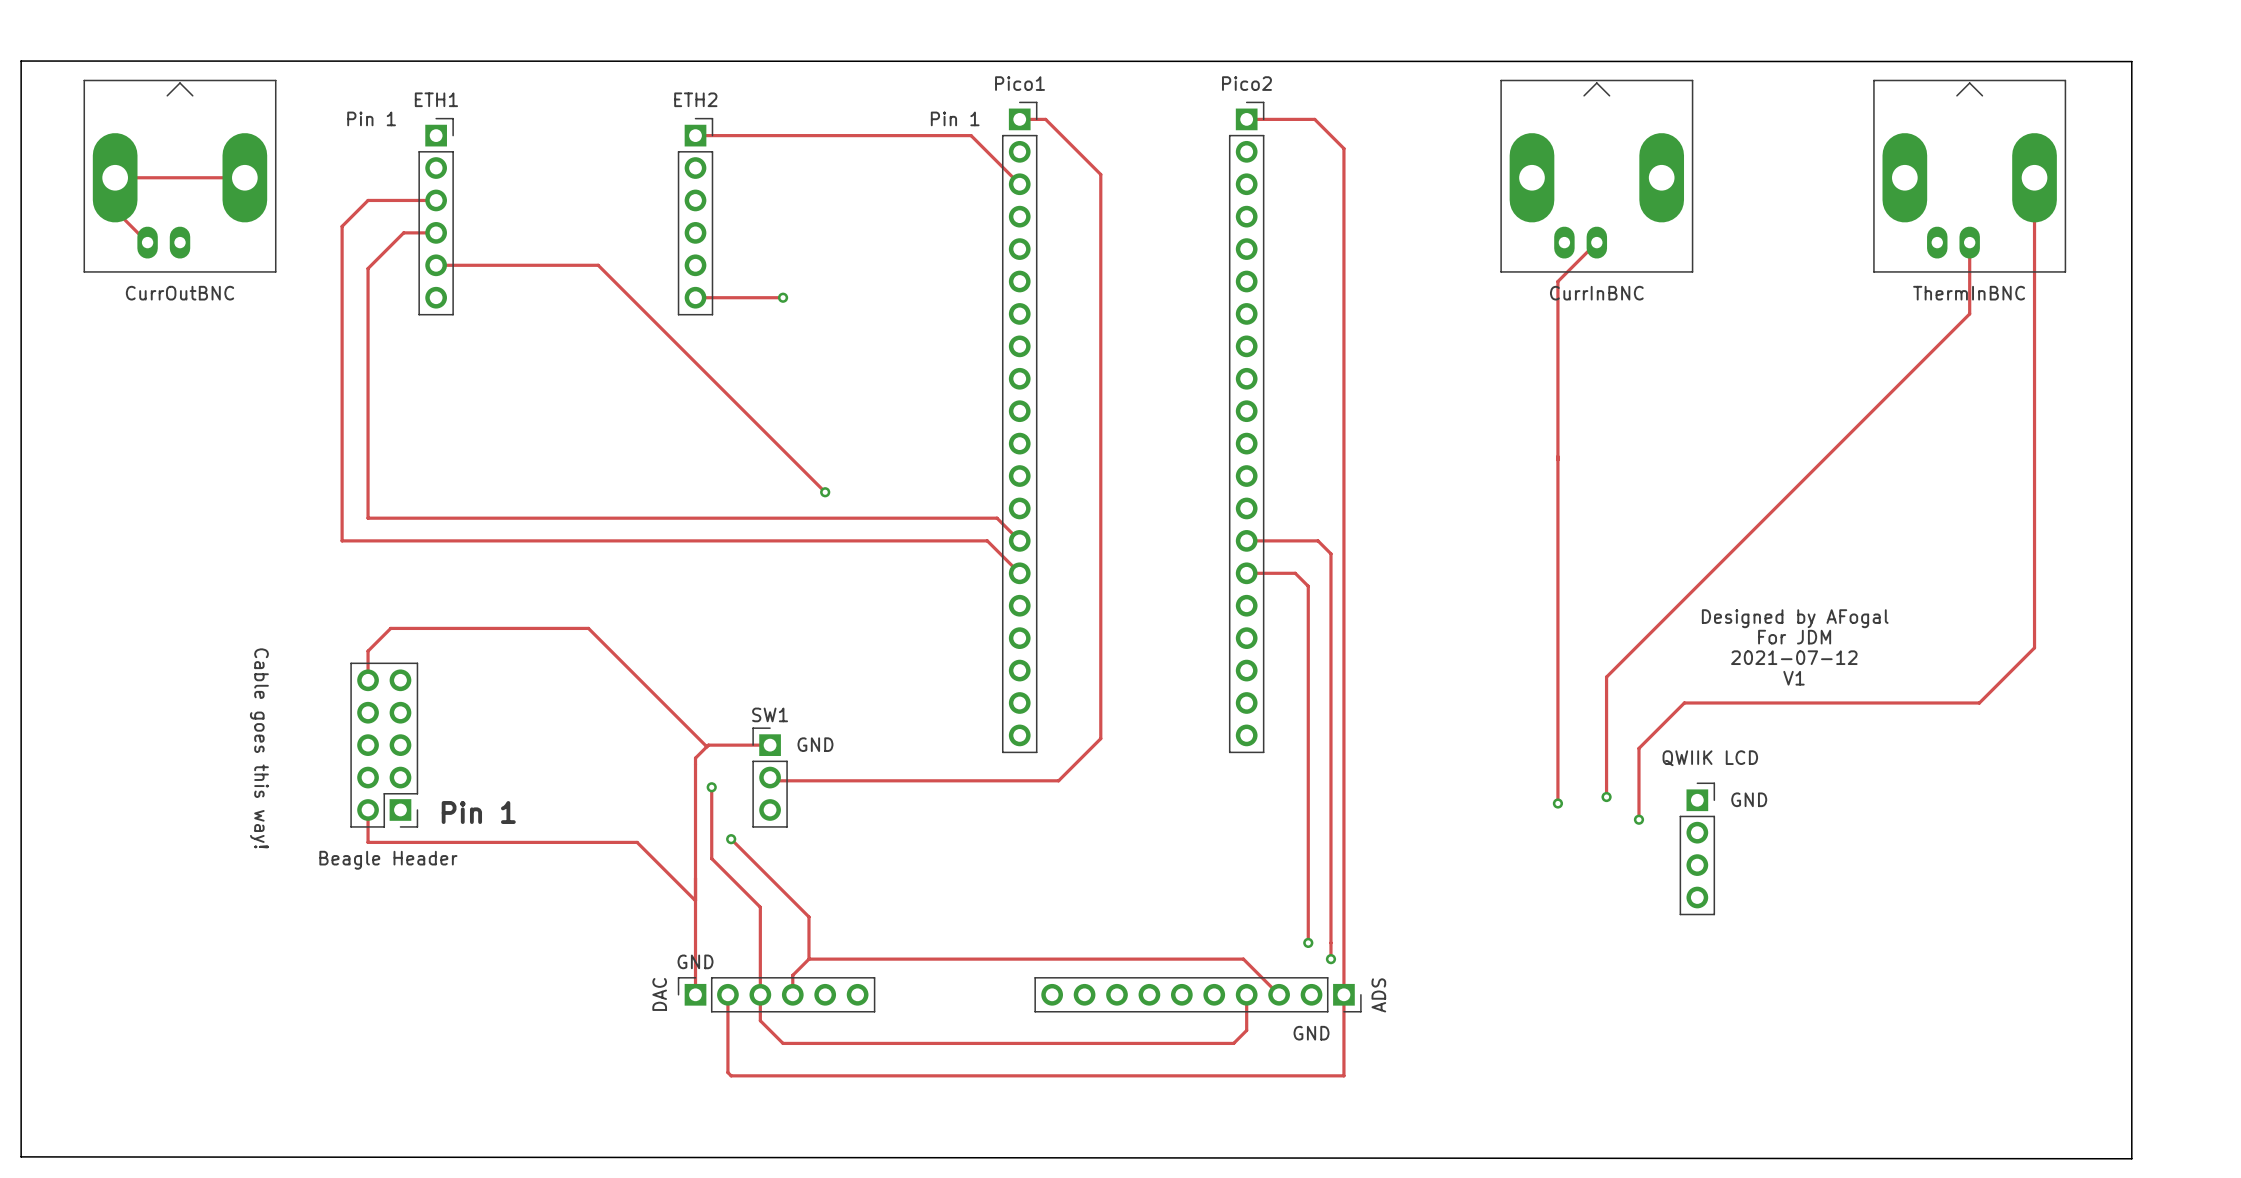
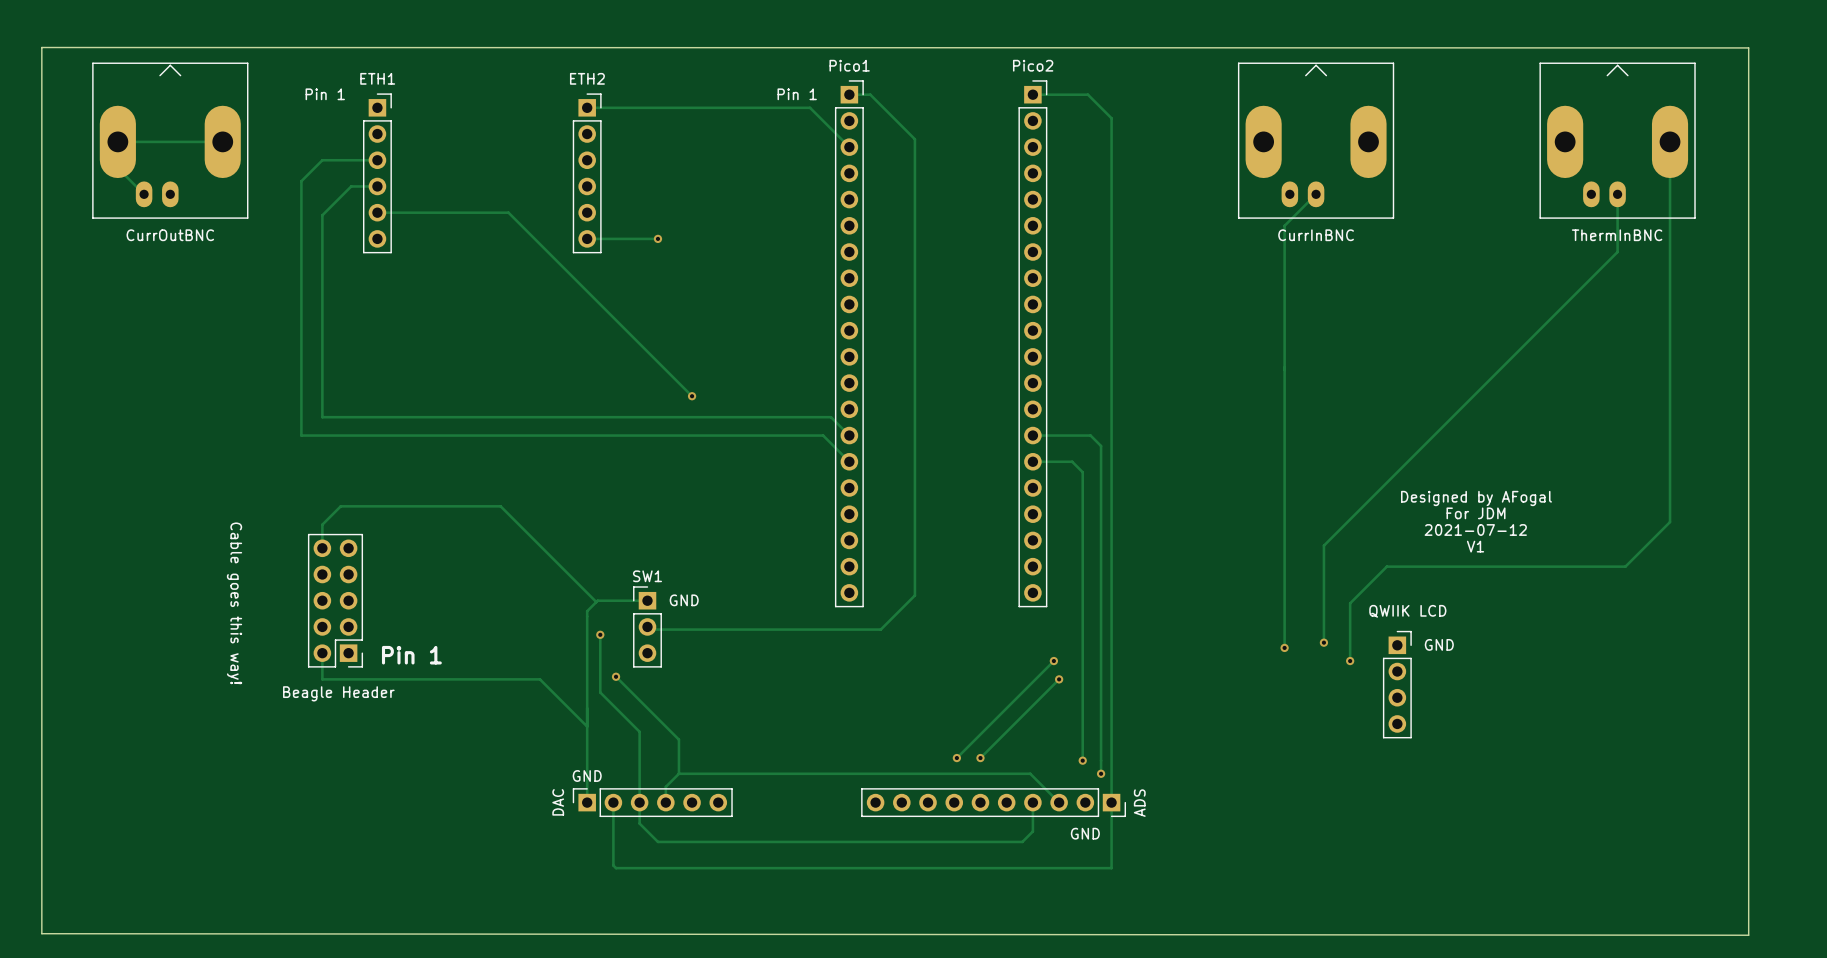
track: none -> (1053, 661) (956, 758)
via: none -> (1053, 661)
track: none -> (1059, 679) (980, 758)
via: none -> (1059, 679)
via: none -> (956, 758)
via: none -> (980, 758)

